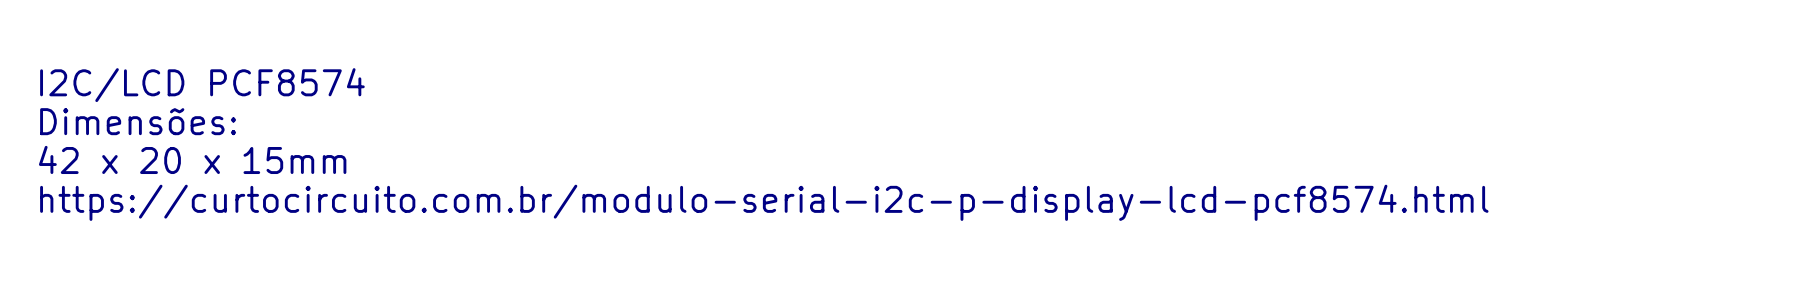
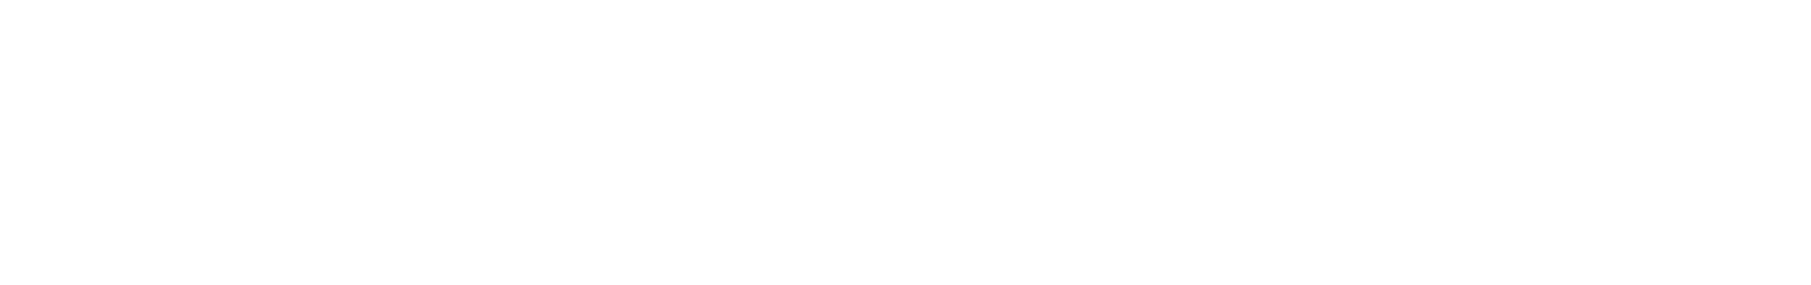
text: I2C/LCD PCF8574 (202, 85) -> none
text: Dimensões: (138, 121) -> none
text: 42 x 20 x 15mm (192, 159) -> none
text: https://curtocircuito.com.br/modulo-serial-i2c-p-display-lcd-pcf8574.html (764, 202) -> none

